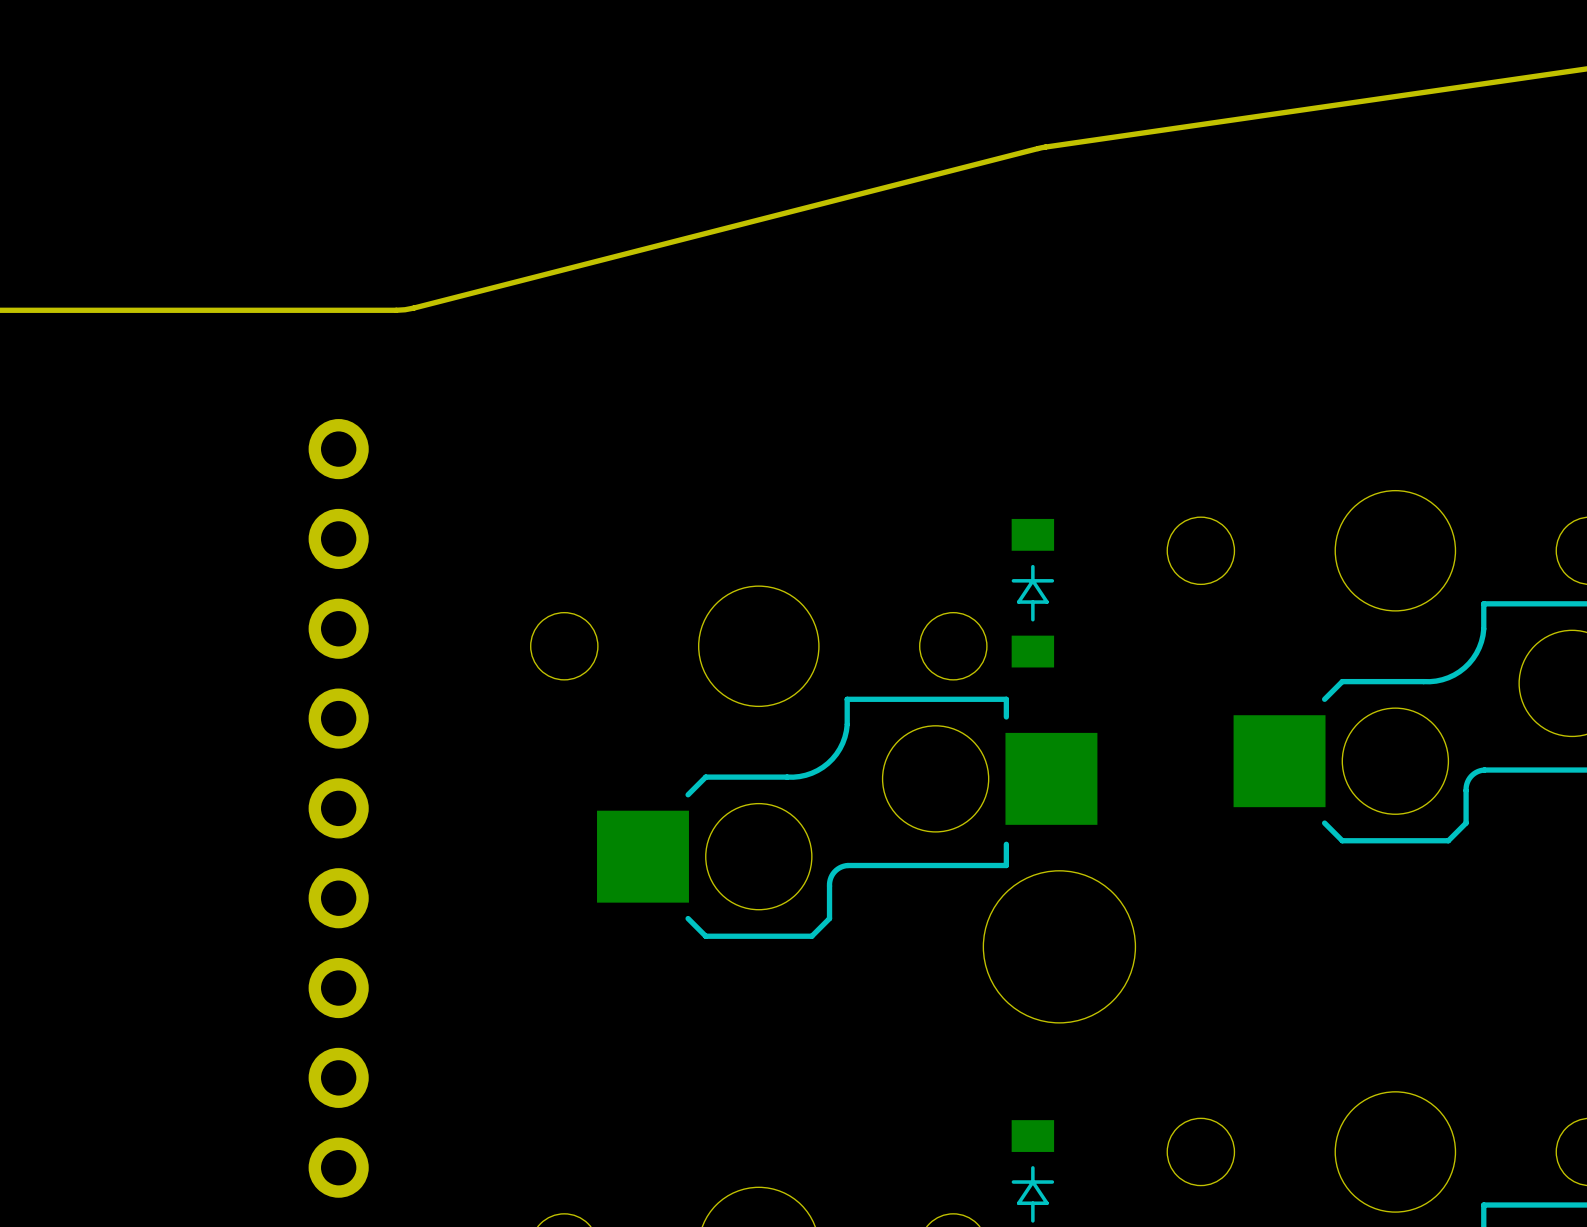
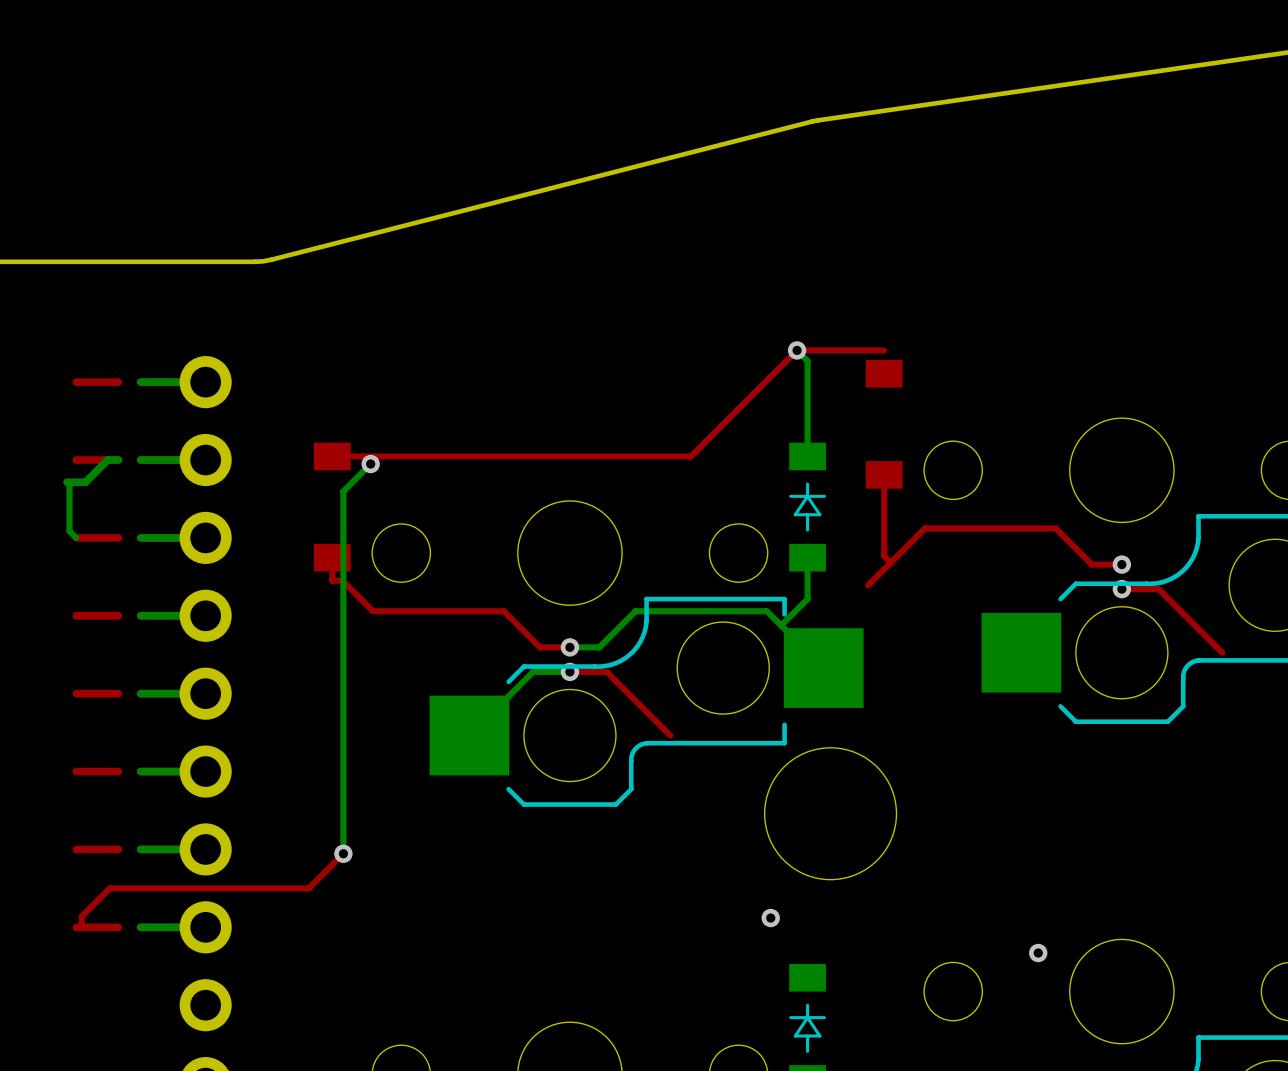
bottom track: none -> (797, 350) (807, 360) (807, 456)
via: none -> (797, 350)
top track: none -> (883, 350) (797, 350) (690, 456) (332, 456)
top track: none -> (118, 382) (76, 382)
bottom track: none -> (205, 382) (140, 382)
part: none -> (884, 424)
top track: none -> (118, 460) (76, 460)
bottom track: none -> (118, 460) (107, 460) (85, 482) (67, 482) (69, 484) (69, 531) (76, 537)
bottom track: none -> (205, 460) (140, 460)
bottom track: none -> (370, 464) (343, 491) (343, 853)
via: none -> (370, 464)
top track: none -> (884, 474) (884, 556) (890, 562)
part: none -> (332, 507)
top track: none -> (118, 537) (76, 537)
bottom track: none -> (205, 537) (140, 537)
top track: none -> (332, 557) (332, 580) (342, 580) (373, 611) (503, 611) (540, 647) (569, 647)
bottom track: none -> (807, 557) (807, 599) (781, 625)
top track: none -> (1121, 564) (1091, 564) (1055, 528) (924, 528) (868, 585)
via: none -> (1121, 564)
top track: none -> (1121, 589) (1158, 589) (1222, 652)
via: none -> (1121, 589)
top track: none -> (118, 615) (76, 615)
bottom track: none -> (205, 615) (140, 615)
bottom track: none -> (569, 647) (599, 647) (635, 611) (766, 611) (823, 668)
via: none -> (569, 647)
top track: none -> (569, 671) (606, 671) (670, 735)
bottom track: none -> (569, 671) (533, 671) (469, 735)
via: none -> (569, 671)
top track: none -> (118, 693) (76, 693)
bottom track: none -> (205, 693) (140, 693)
top track: none -> (118, 771) (76, 771)
bottom track: none -> (205, 771) (140, 771)
top track: none -> (118, 849) (76, 849)
bottom track: none -> (205, 849) (140, 849)
top track: none -> (343, 853) (308, 888) (109, 888) (81, 916) (81, 927)
via: none -> (343, 853)
via: none -> (770, 918)
top track: none -> (118, 927) (76, 927)
bottom track: none -> (205, 927) (140, 927)
via: none -> (1038, 953)

